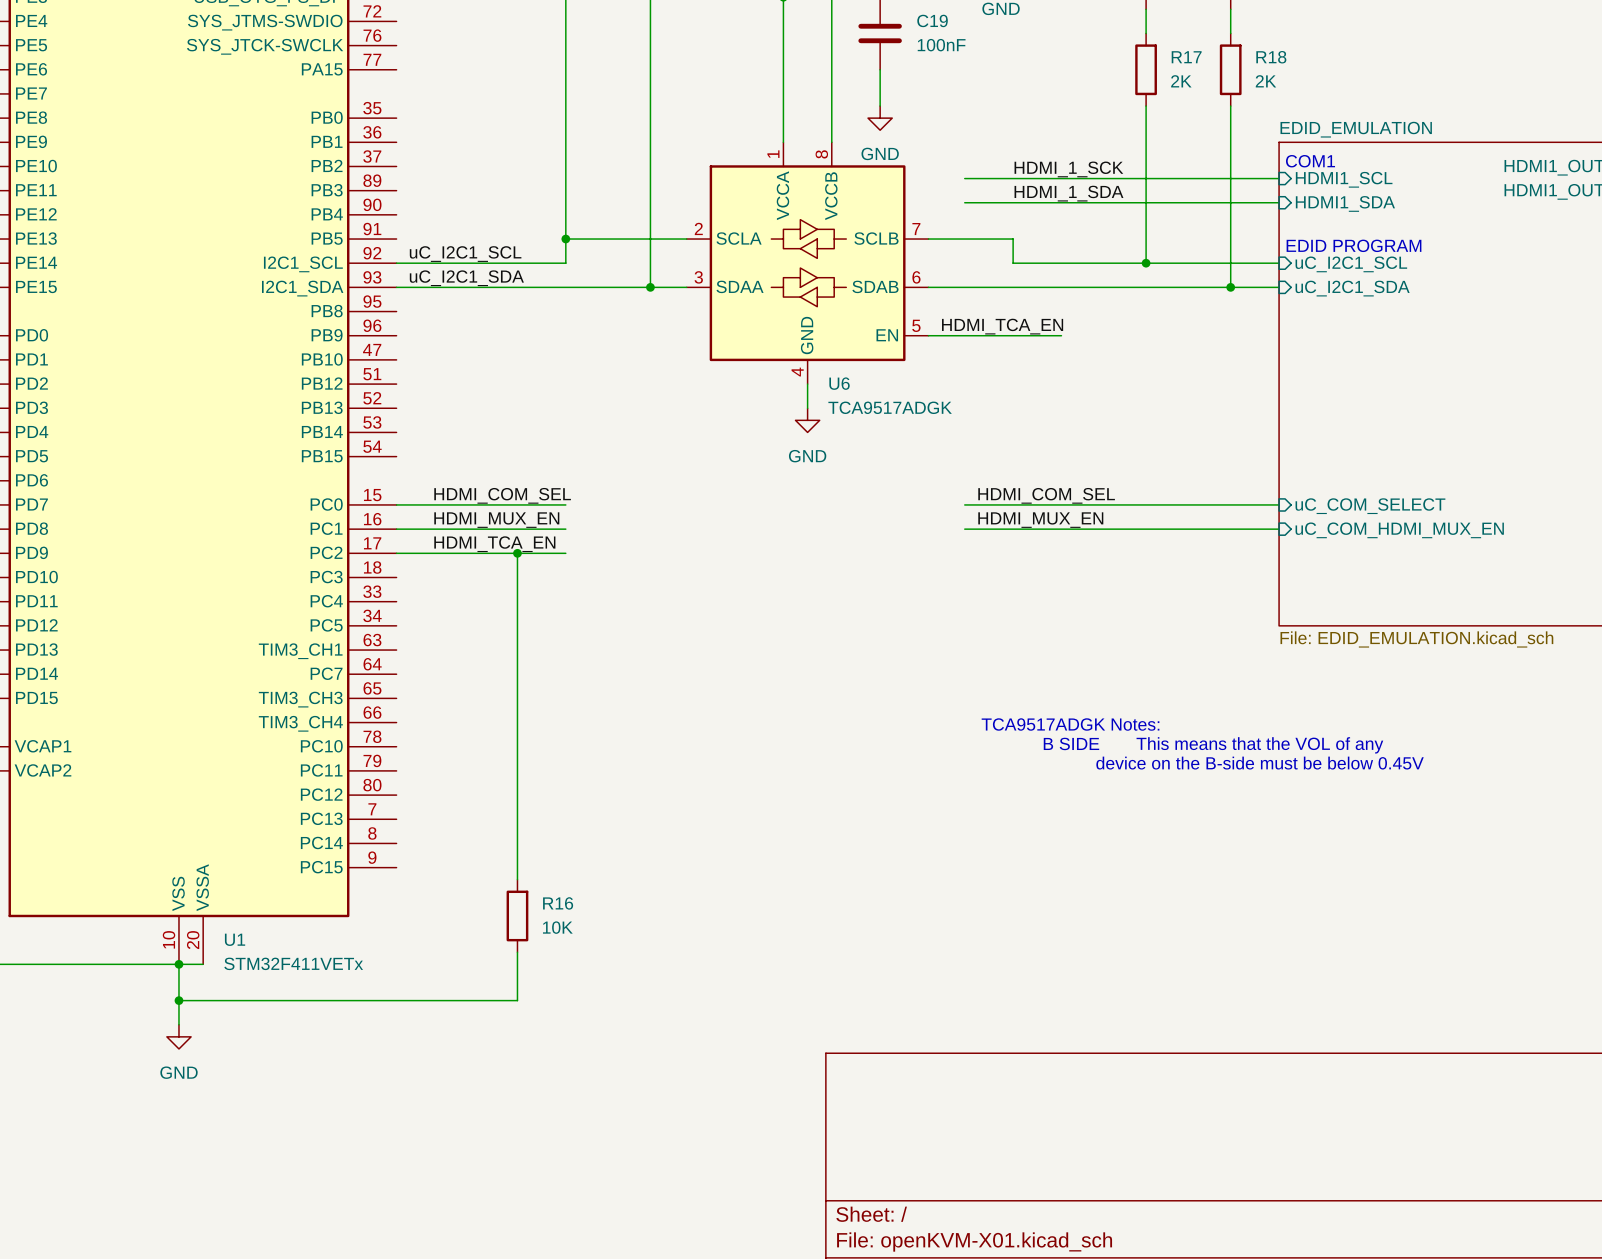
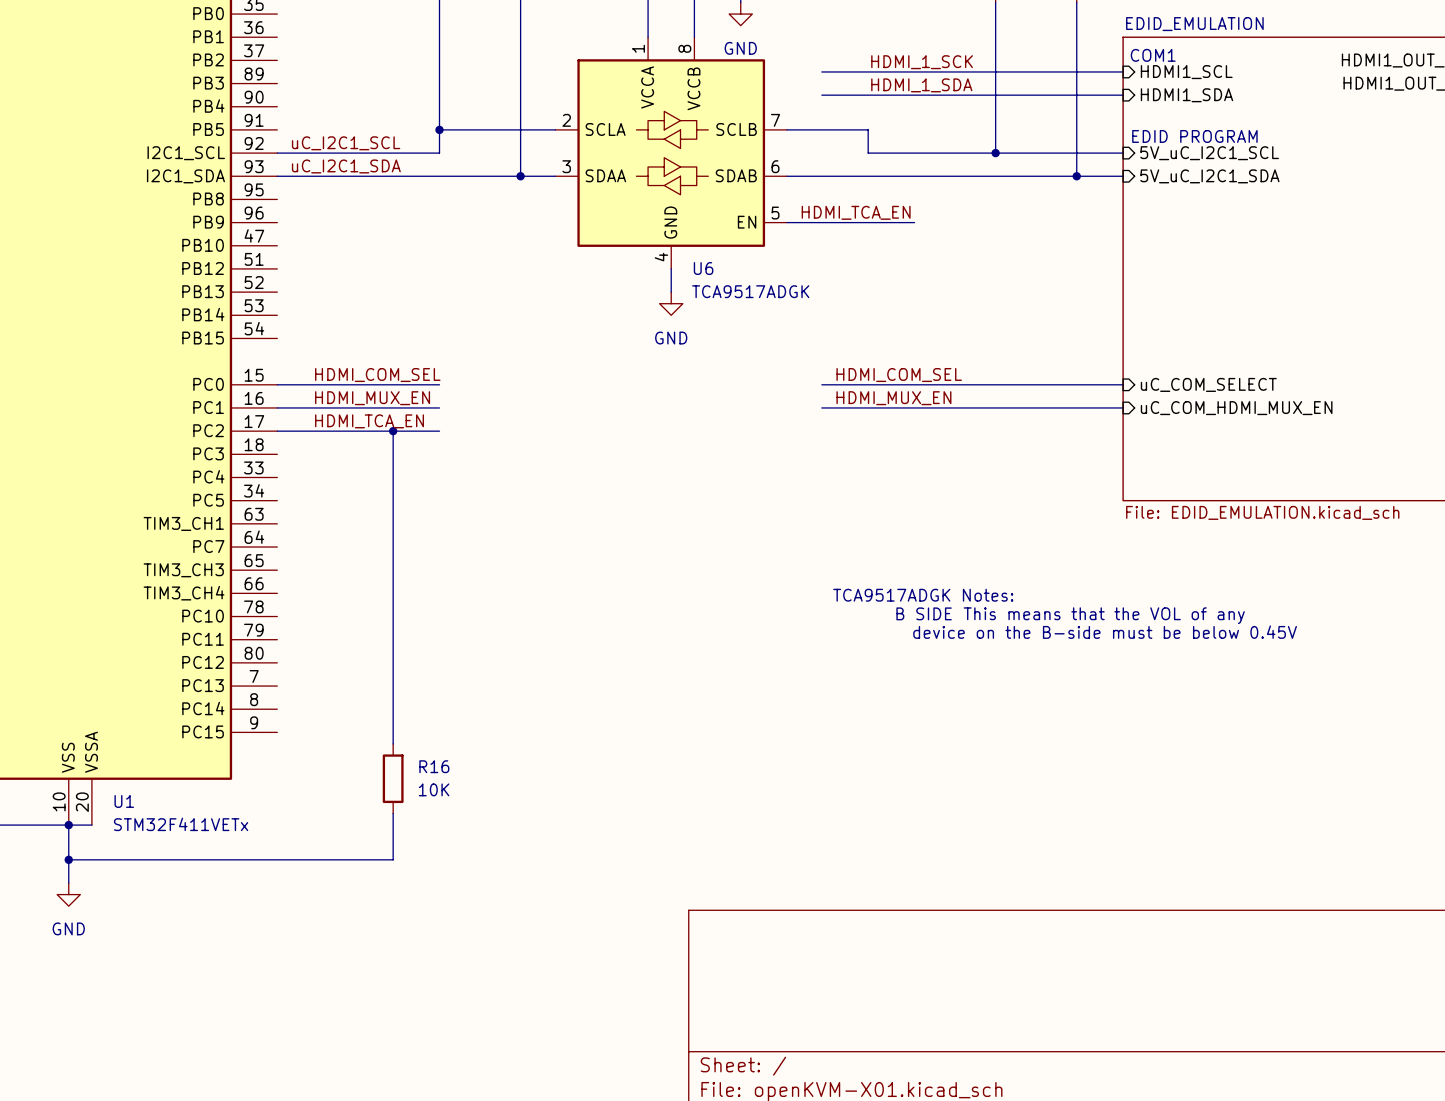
sheet pin: uC_I2C1_SCL (1351, 264) -> 5V_uC_I2C1_SCL (1209, 153)
sheet pin: uC_I2C1_SDA (1352, 288) -> 5V_uC_I2C1_SDA (1209, 176)

